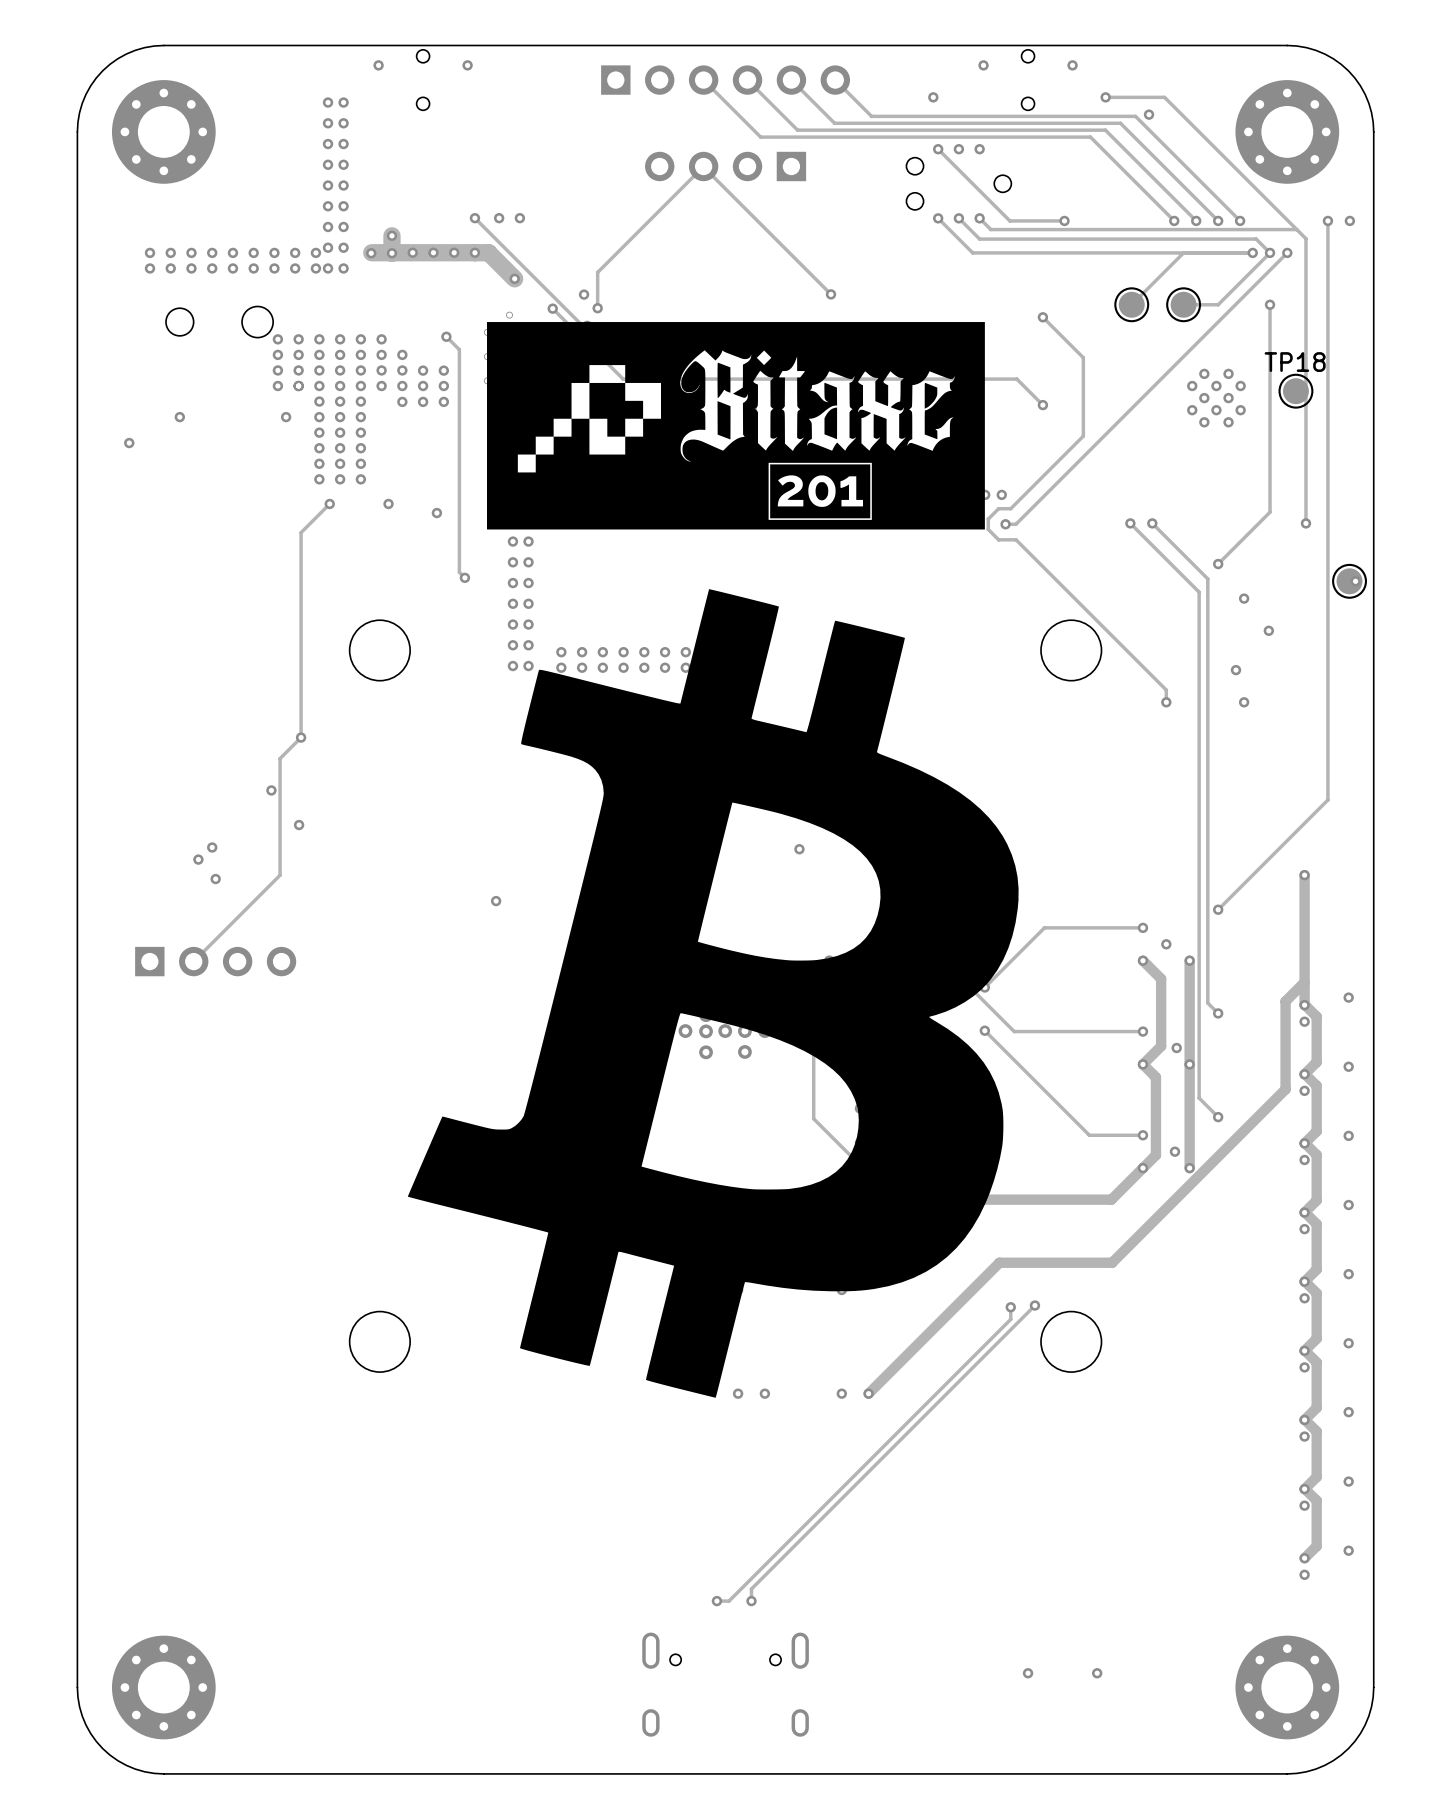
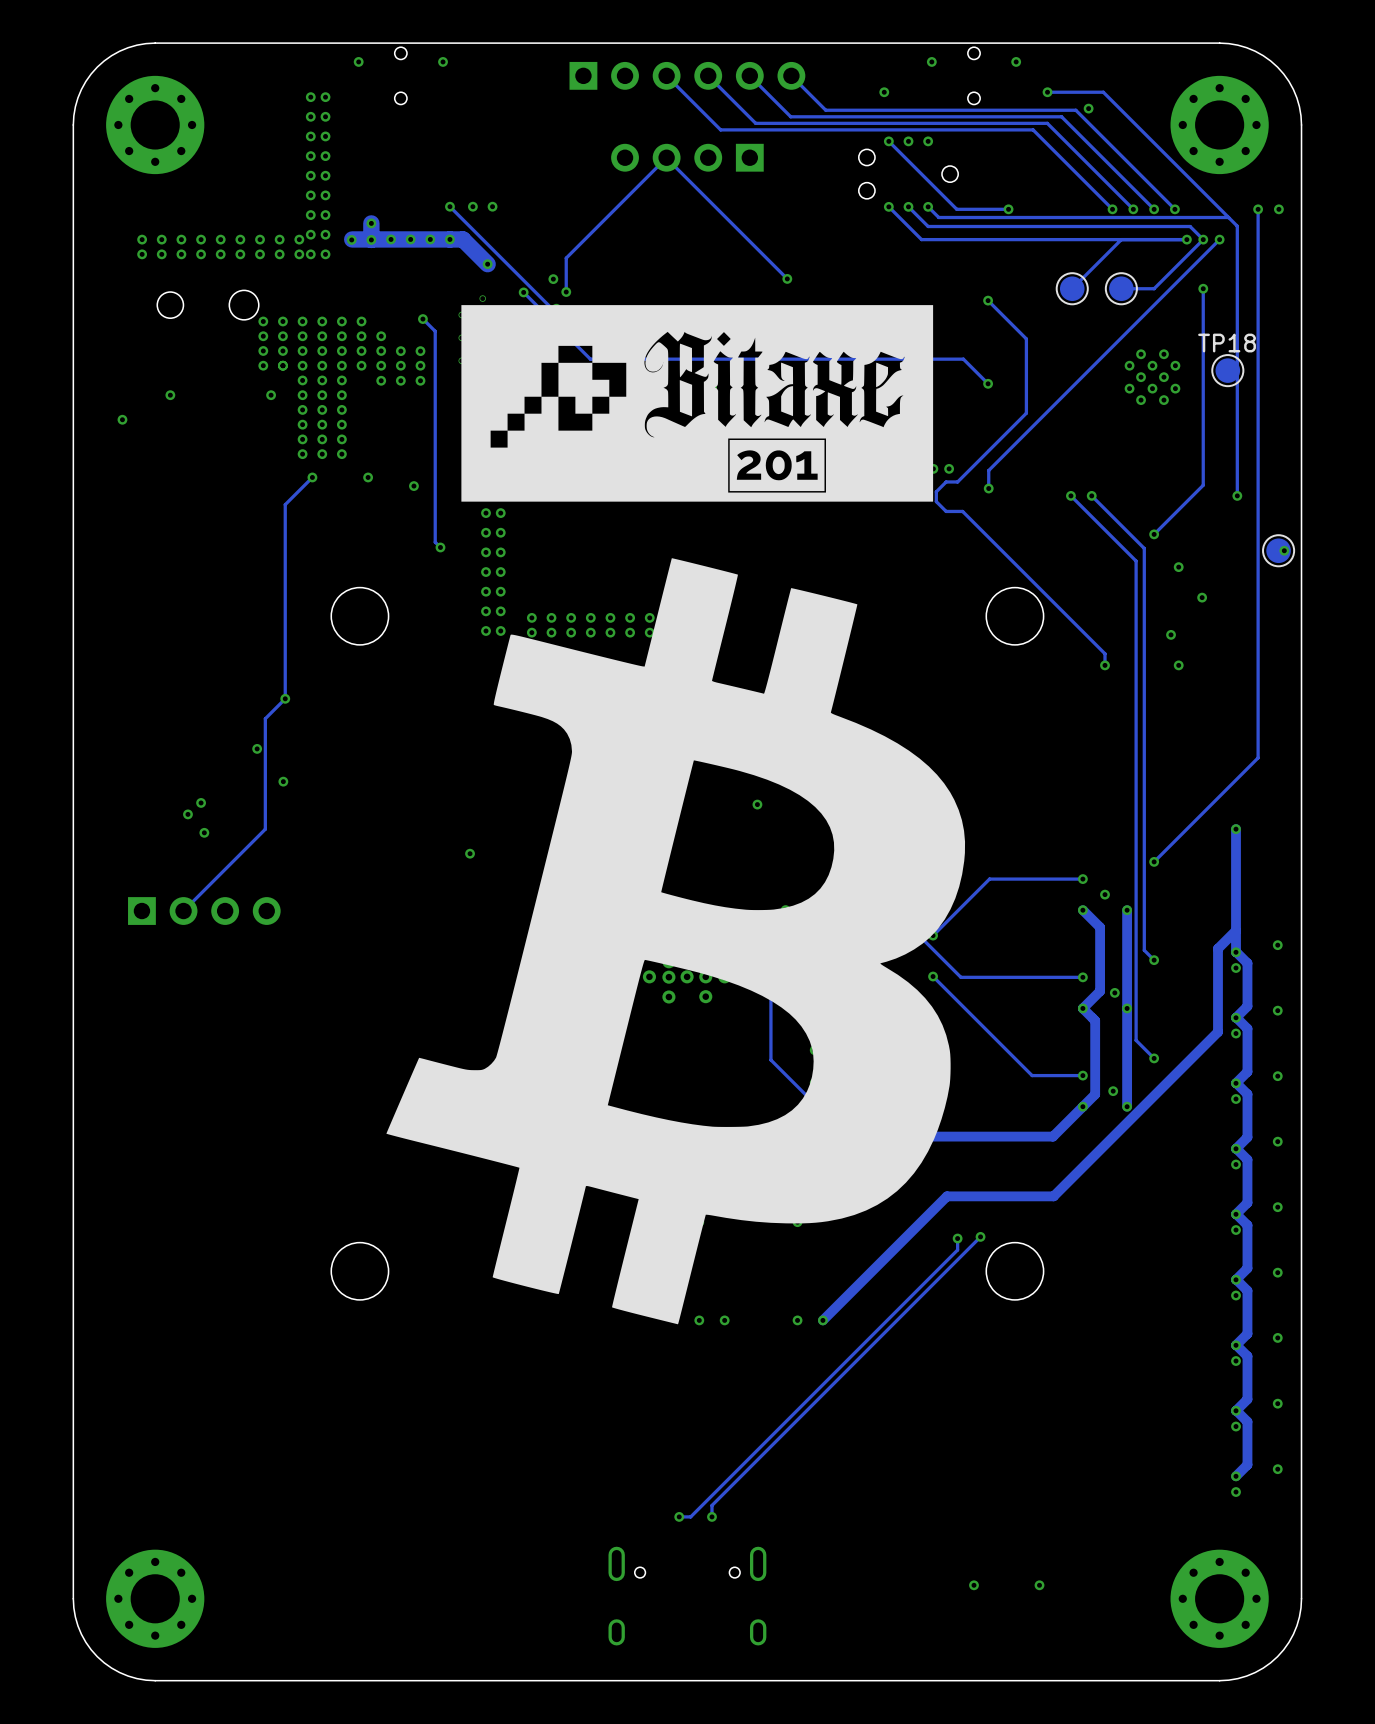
track: (1043, 496) (1015, 524) (1005, 524) -> (988, 470) (988, 488)
via position: (1005, 524) -> (988, 488)

